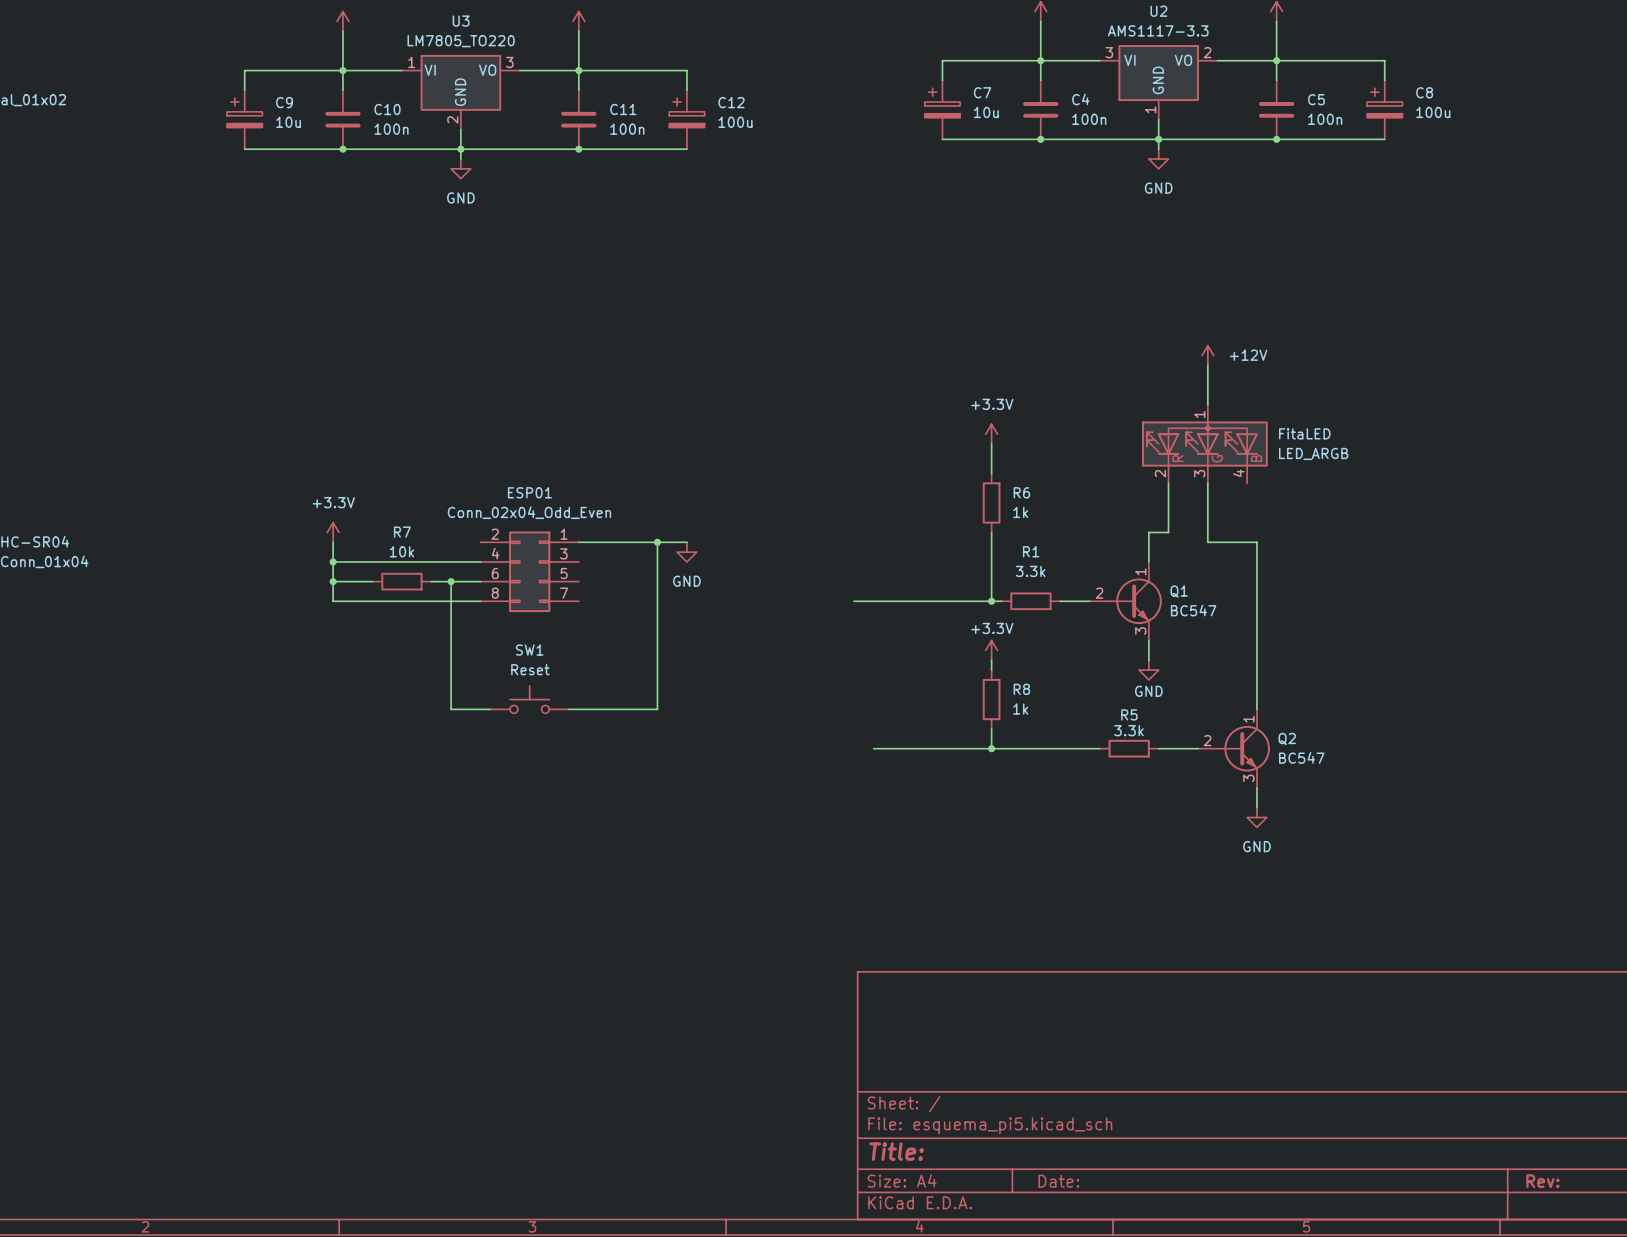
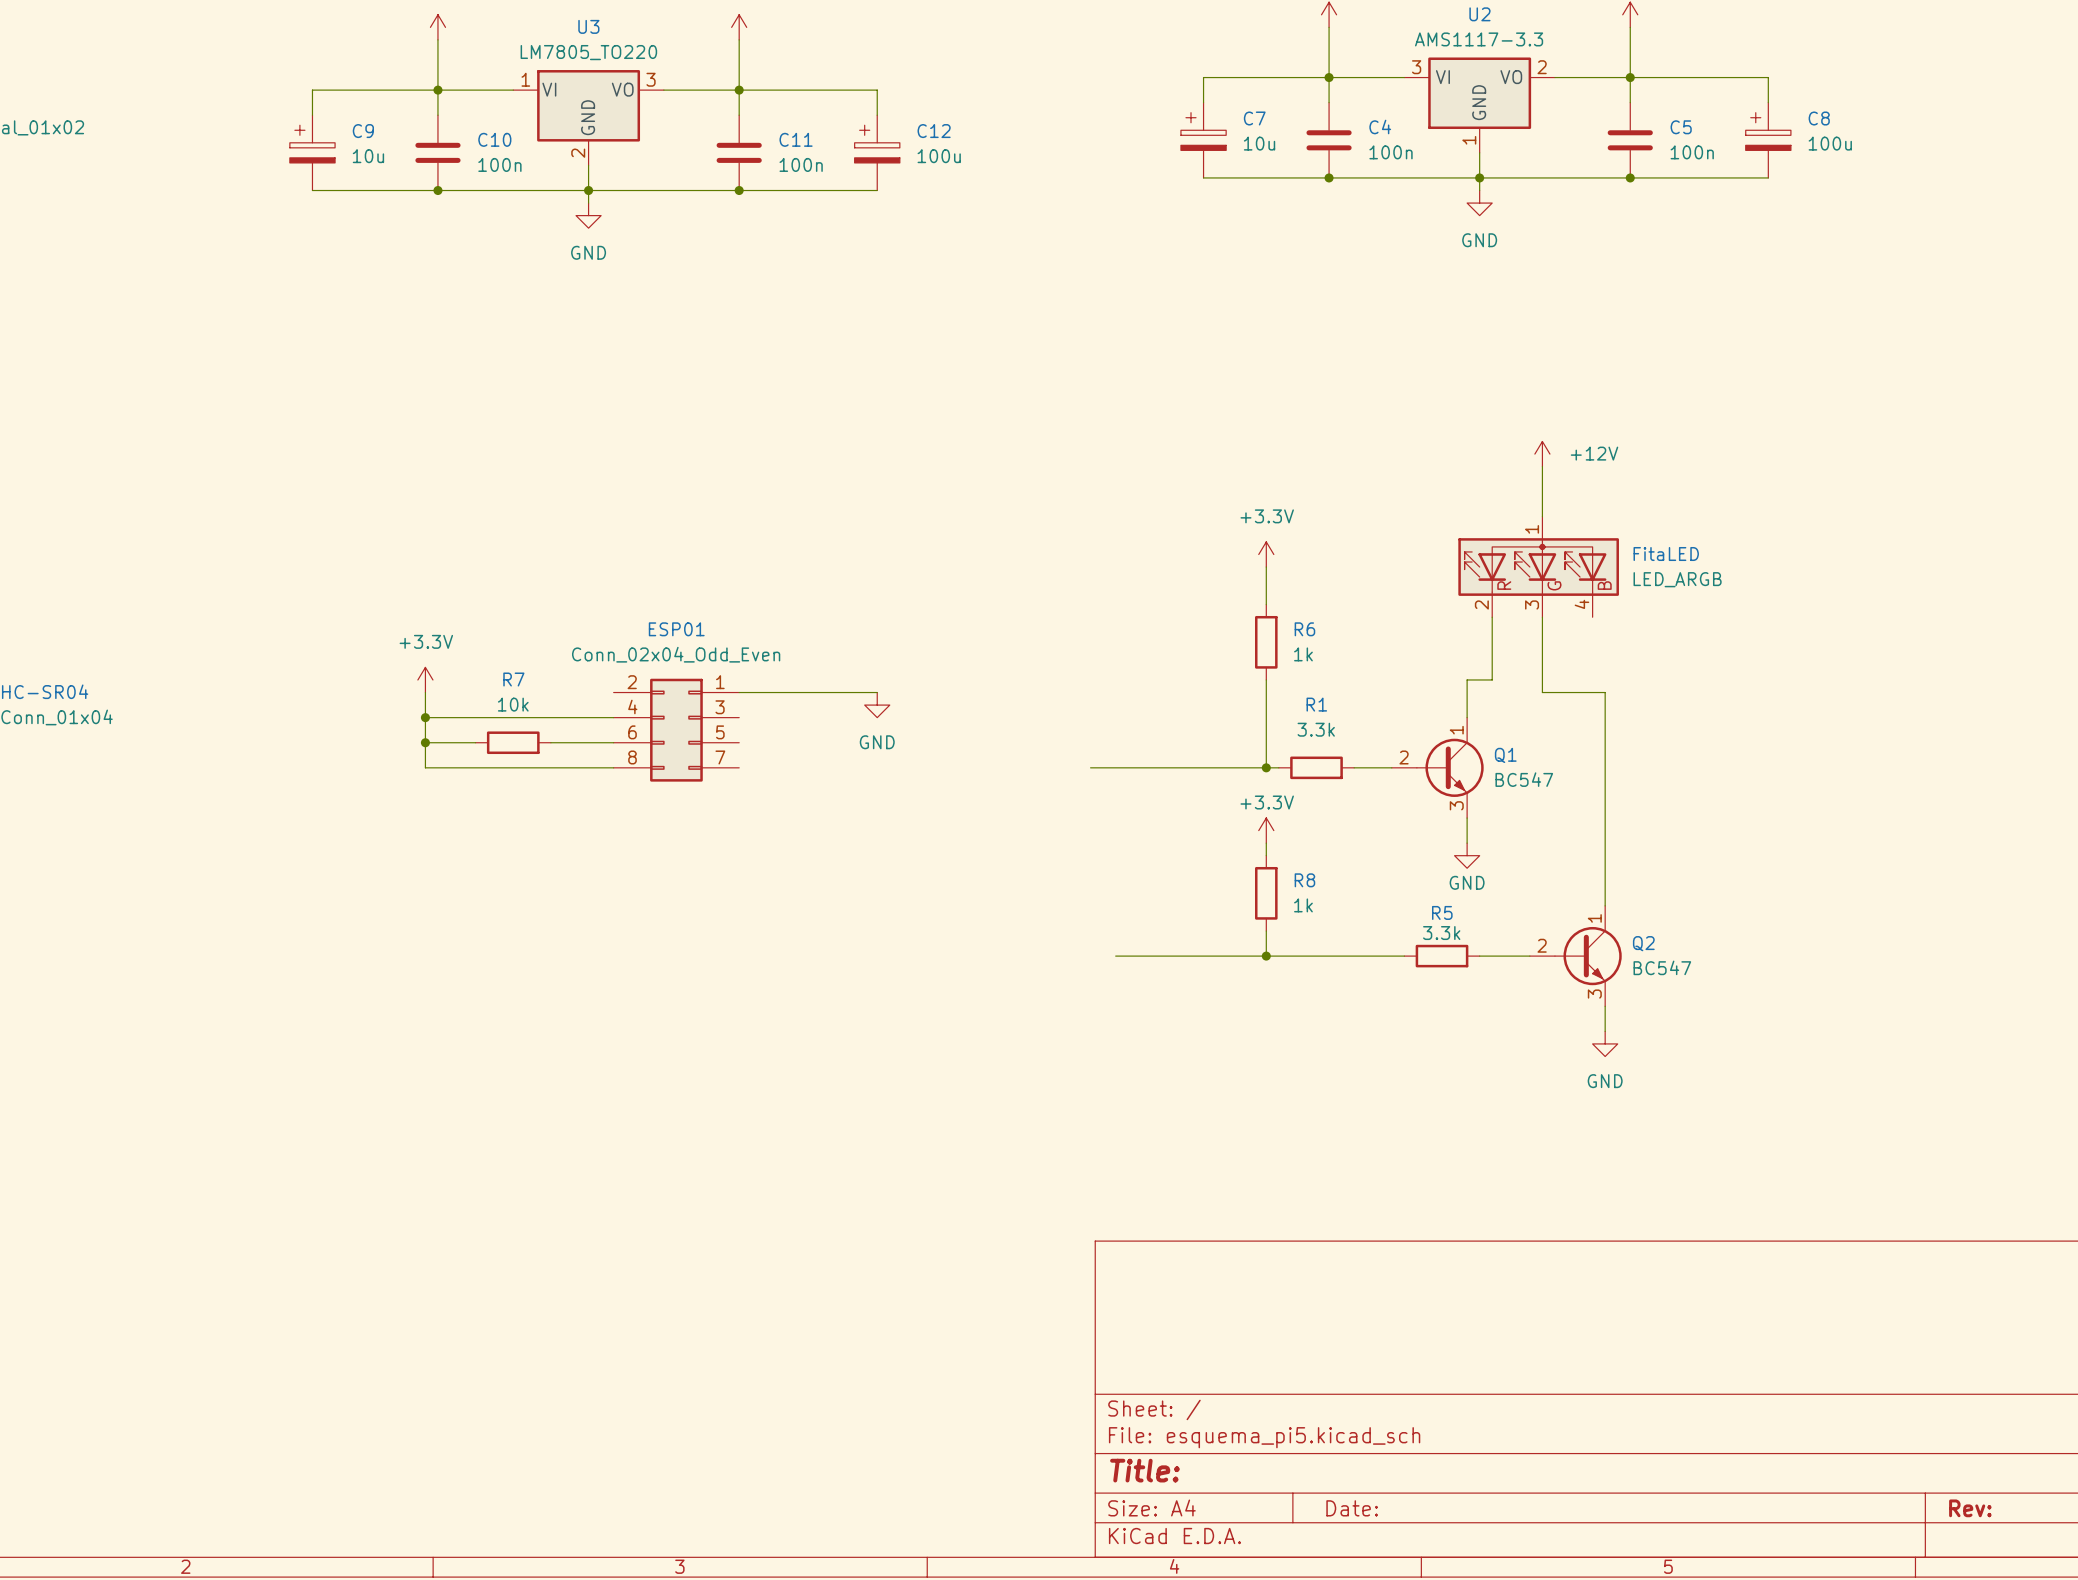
wire: (657, 542) (657, 709) (569, 709) -> none
junction: (657, 542) -> none
wire: (451, 581) (451, 709) (490, 709) -> none
junction: (451, 581) -> none
SW1: Reset (529, 699) -> none

